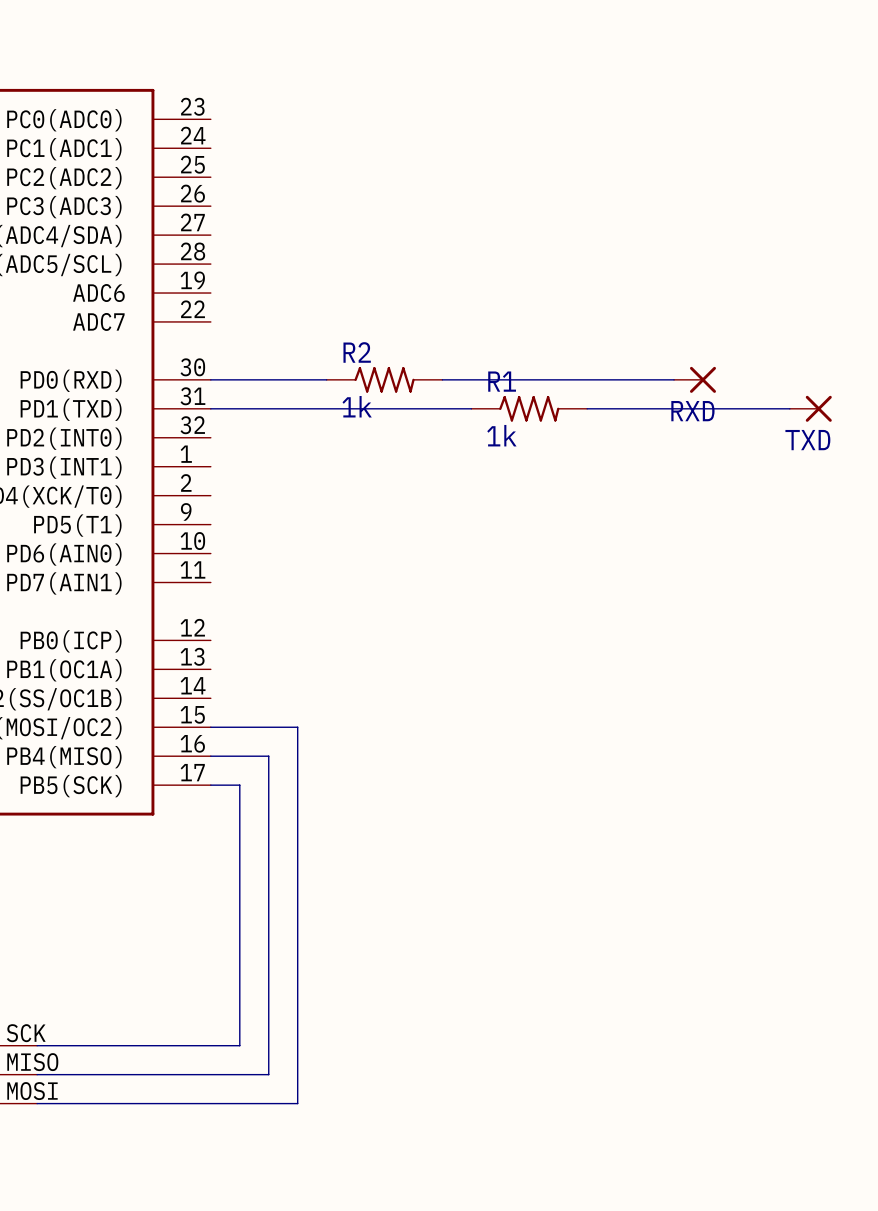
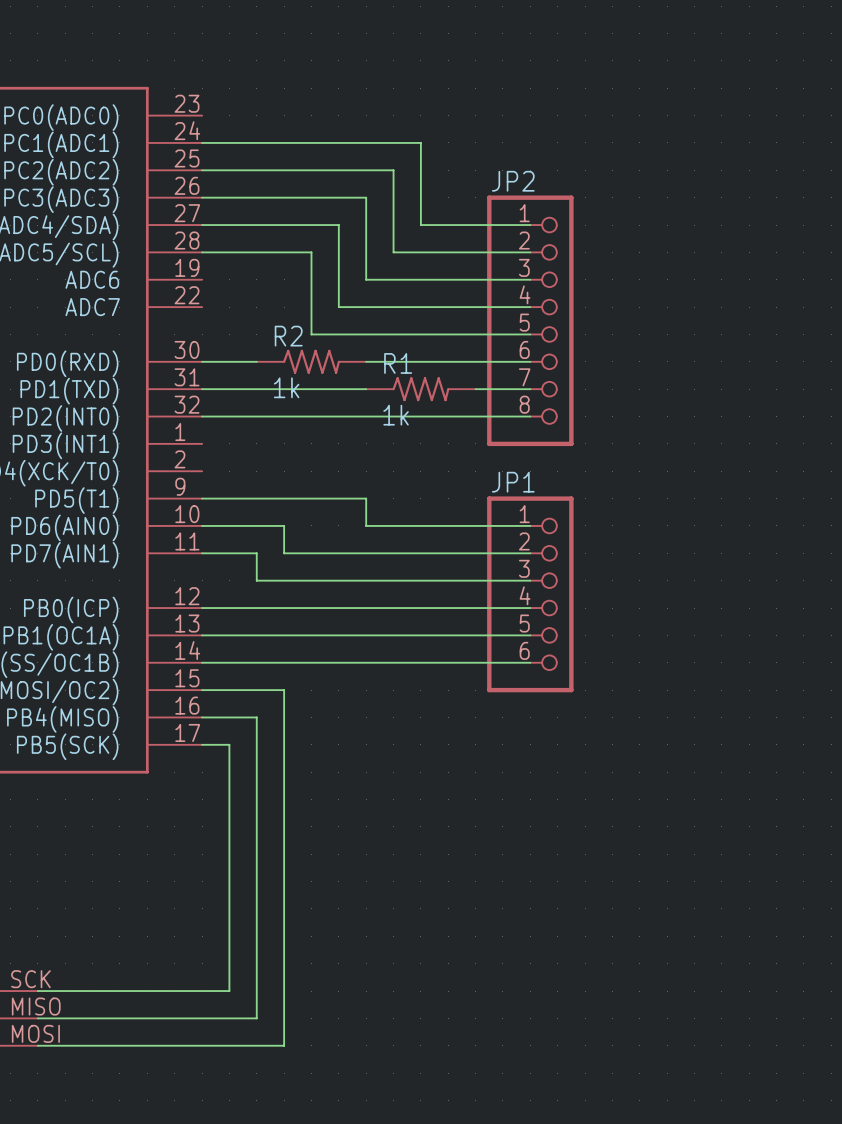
wire: none -> (202, 142) (420, 142) (420, 225) (530, 225)
wire: none -> (202, 170) (393, 170) (393, 252) (530, 252)
wire: none -> (202, 197) (366, 197) (366, 279) (530, 279)
wire: none -> (202, 225) (338, 225) (338, 307) (530, 307)
wire: none -> (202, 252) (311, 252) (311, 334) (530, 334)
JP2: none -> (530, 320)
R2 position: (384, 379) -> (311, 361)
wire: (558, 379) (674, 379) -> none
RXD: (695, 379) -> none
wire: none -> (475, 389) (530, 389)
R1 position: (529, 408) -> (420, 389)
wire: (587, 408) (789, 408) -> none
TXD: (810, 408) -> none
wire: none -> (202, 416) (530, 416)
wire: none -> (202, 498) (366, 498) (366, 525) (530, 525)
wire: none -> (202, 525) (284, 525) (284, 553) (530, 553)
wire: none -> (202, 553) (256, 553) (256, 580) (530, 580)
JP1: none -> (530, 594)
wire: none -> (202, 608) (530, 608)
wire: none -> (202, 635) (530, 635)
wire: none -> (202, 662) (530, 662)

